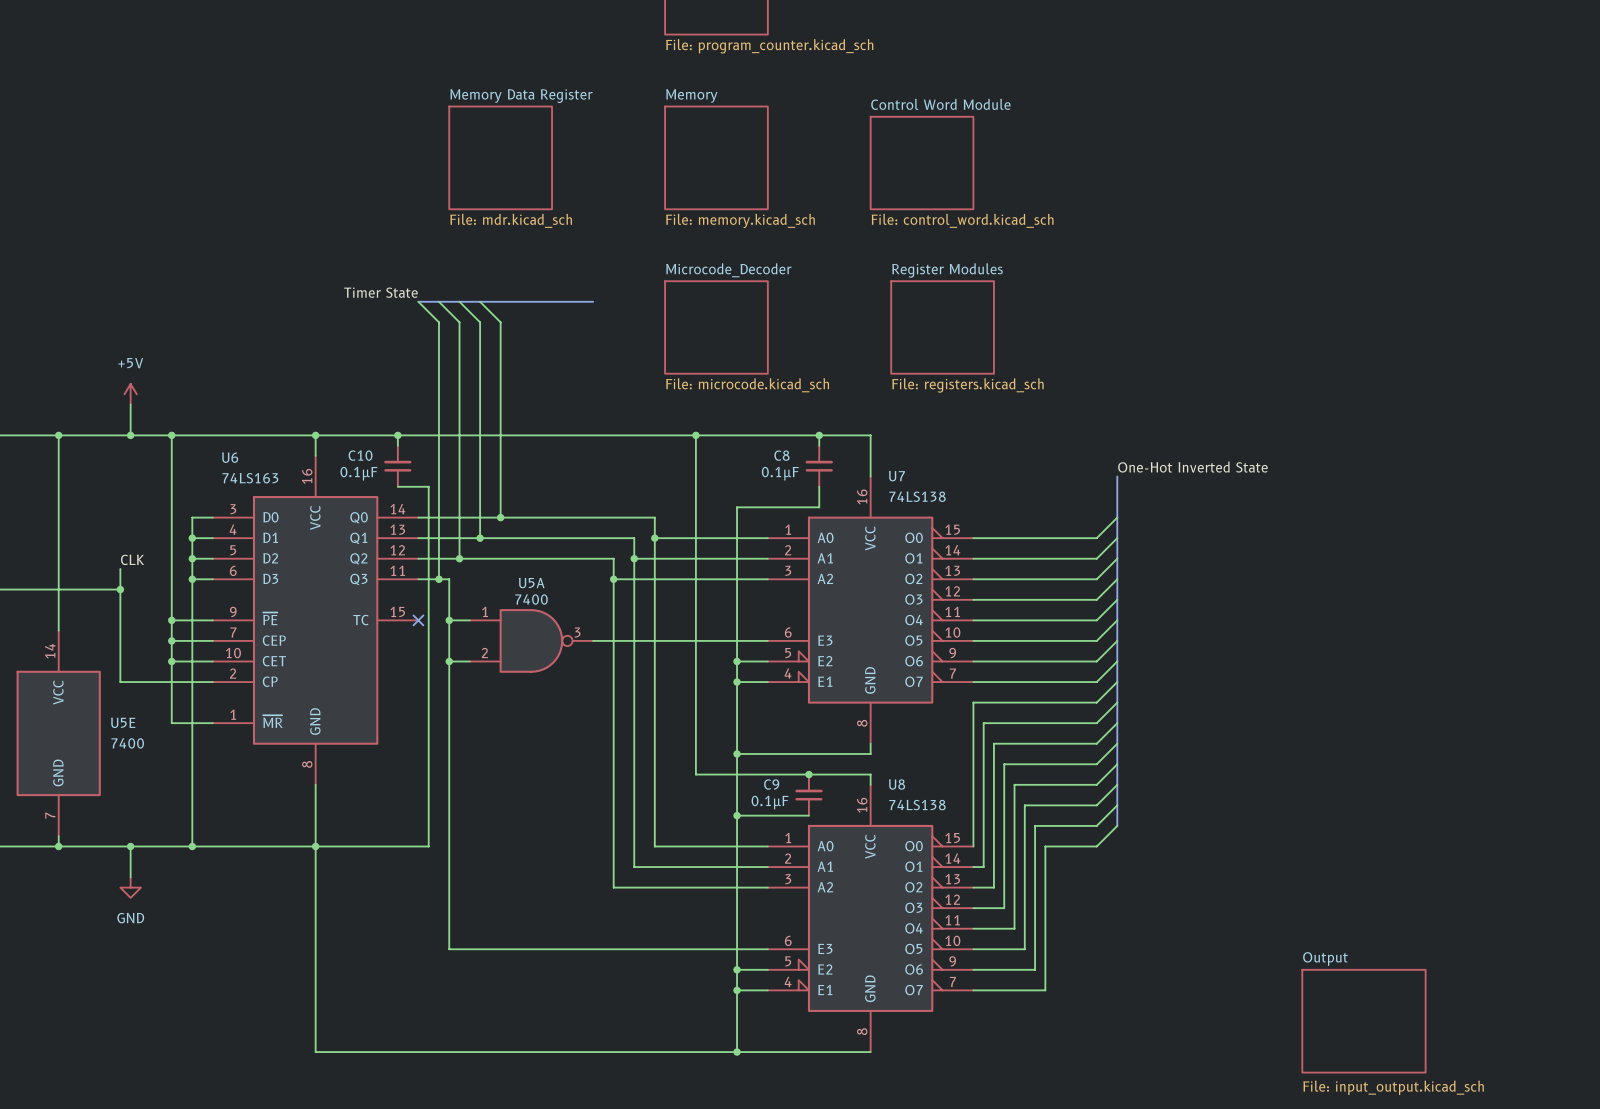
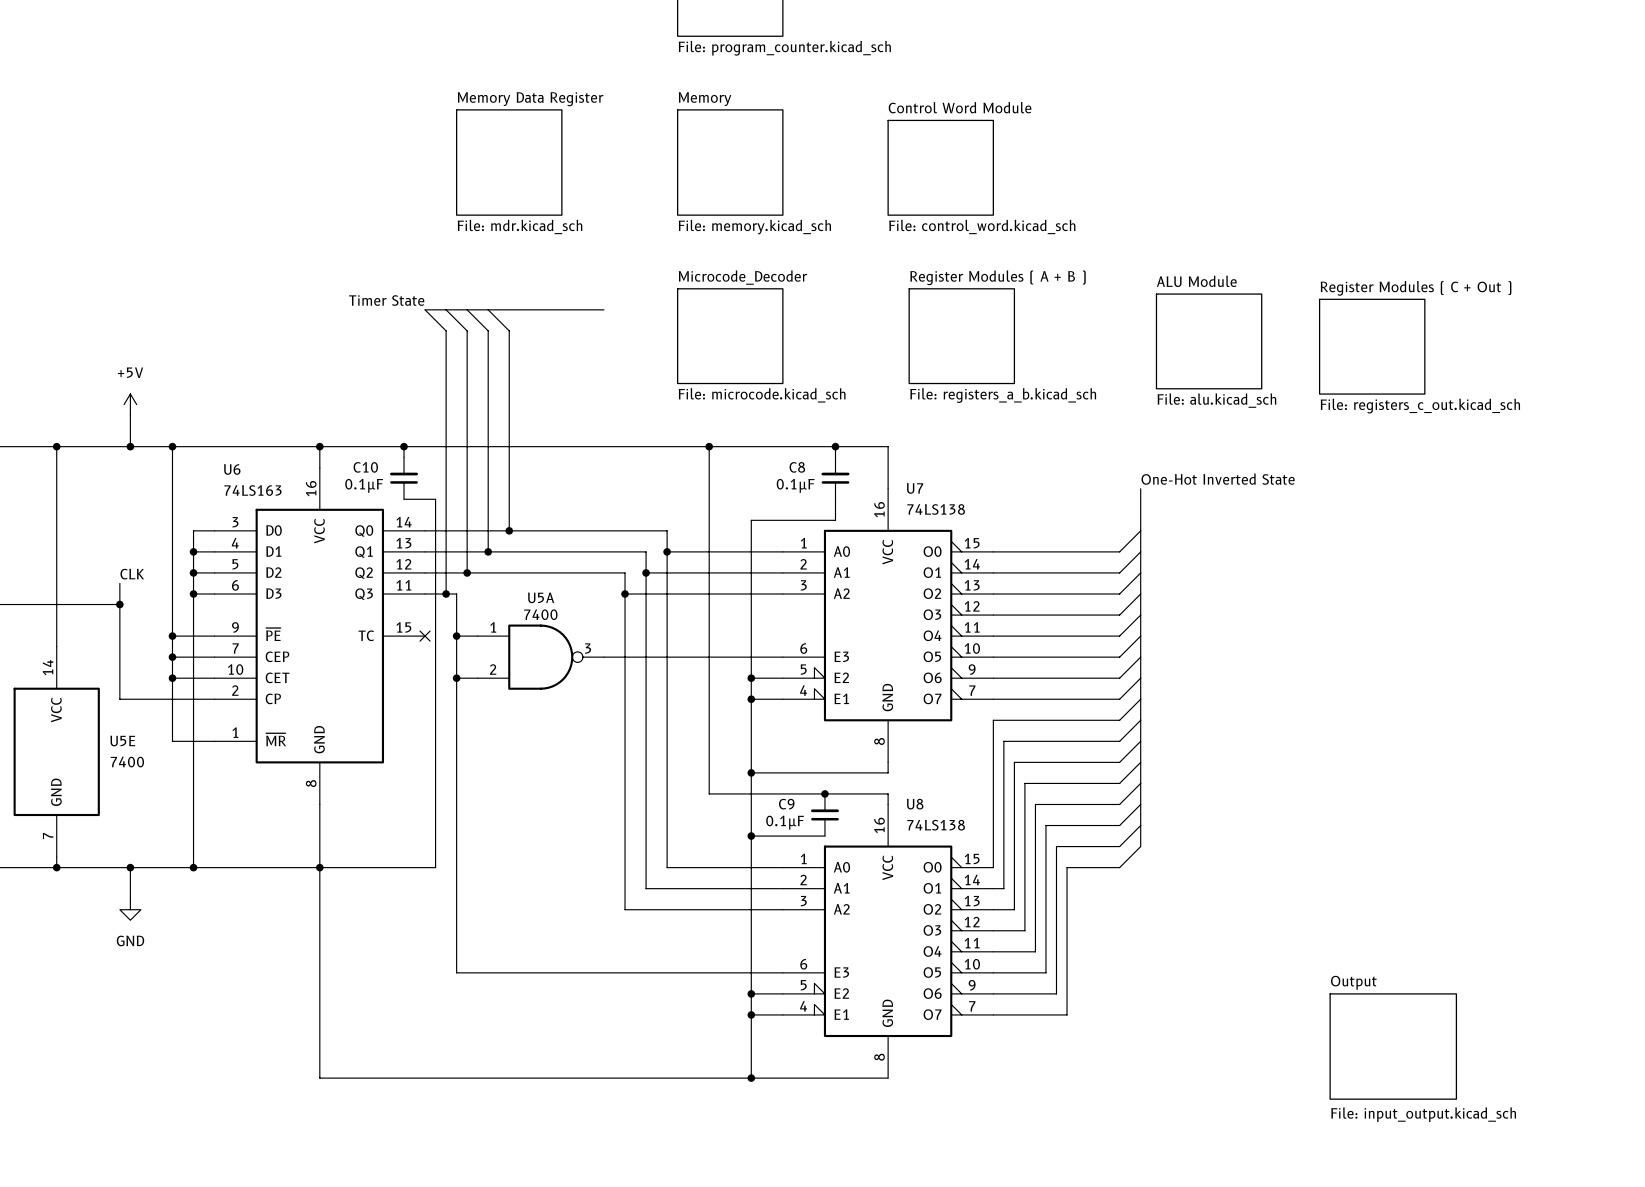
sheet Register Modules name: Register Modules (947, 270) -> Register Modules ( A + B ) (997, 277)
sheet ALU Module: none -> File: alu.kicad_sch (1209, 341)
sheet Register Modules ( C + Out ): none -> File: registers_c_out.kicad_sch (1372, 346)
sheet Register Modules value: File: registers.kicad_sch (967, 385) -> File: registers_a_b.kicad_sch (1003, 395)

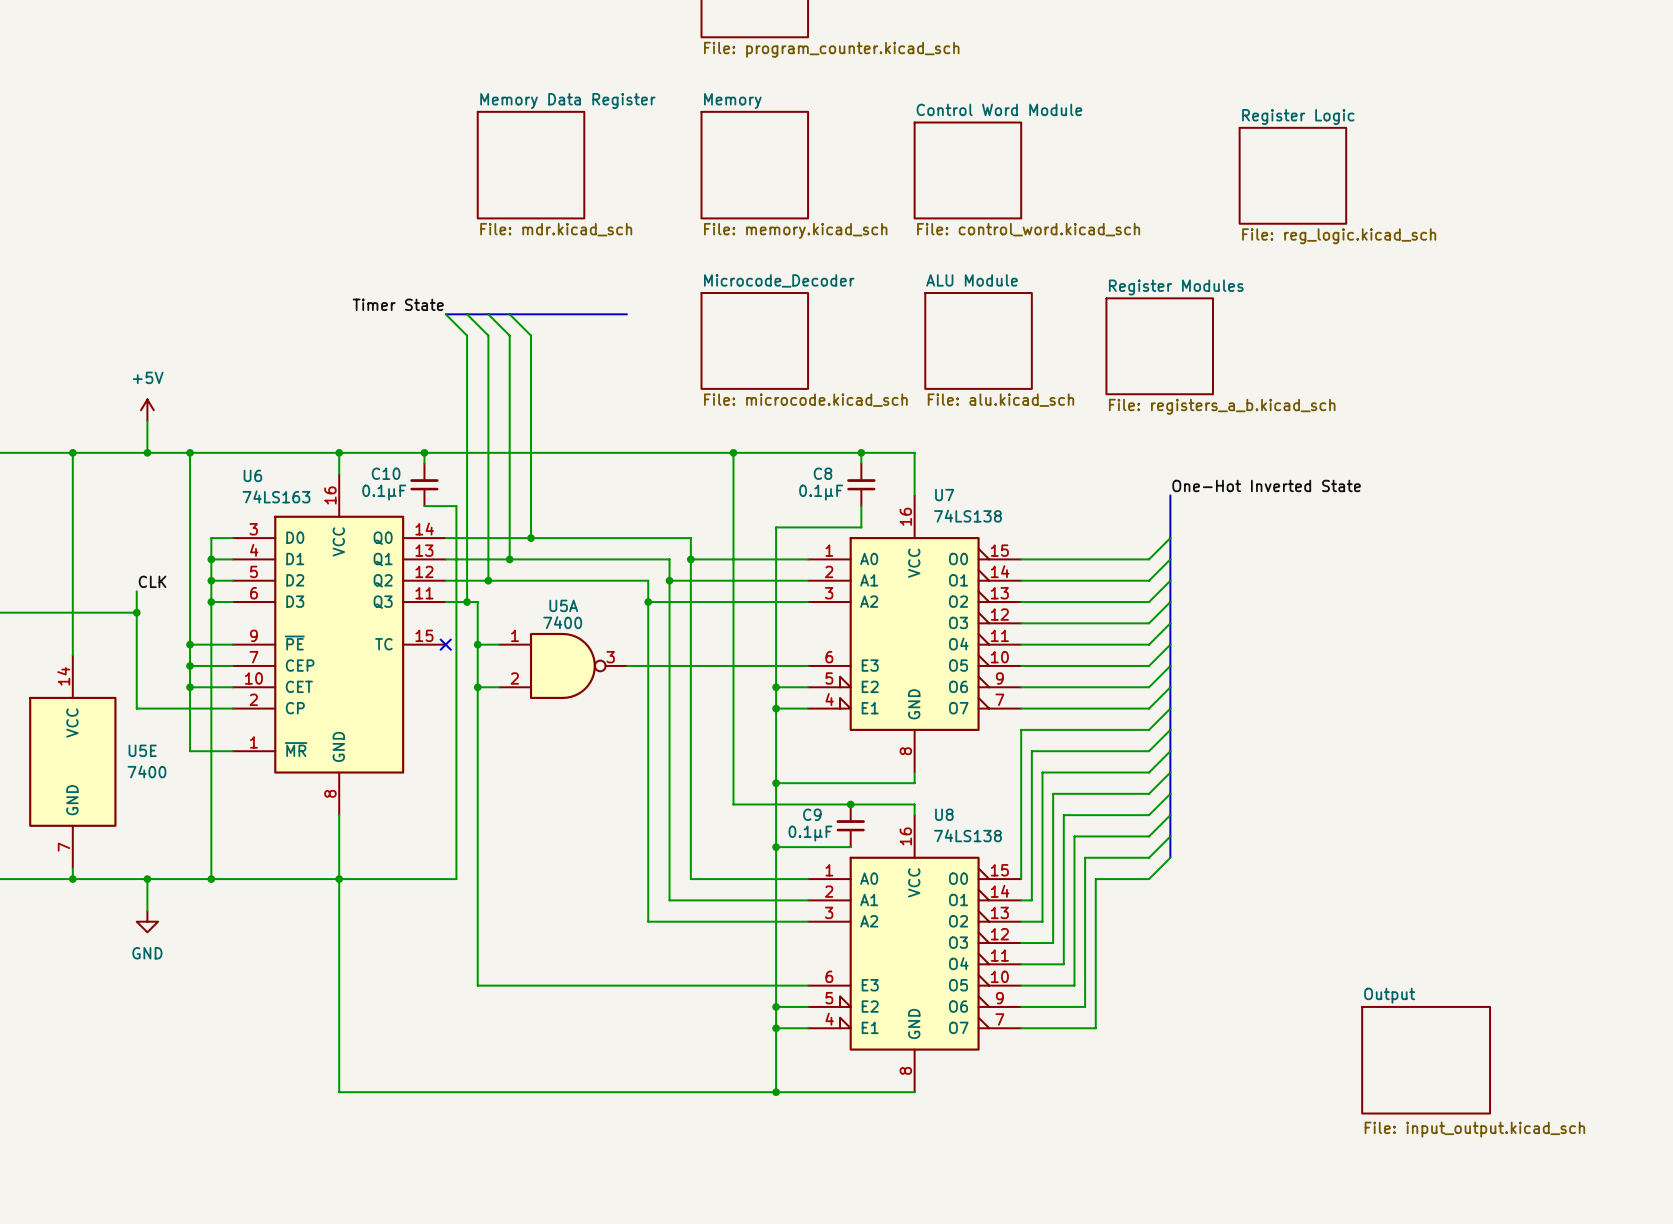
sheet Register Logic: none -> File: reg_logic.kicad_sch (1292, 175)
sheet ALU Module: none -> File: alu.kicad_sch (978, 340)
sheet Register Modules ( A + B ): File: registers_a_b.kicad_sch (961, 336) -> none
sheet Register Modules: none -> File: registers_a_b.kicad_sch (1159, 346)
sheet ALU Module: File: alu.kicad_sch (1209, 341) -> none
sheet Register Modules ( C + Out ): File: registers_c_out.kicad_sch (1372, 346) -> none

